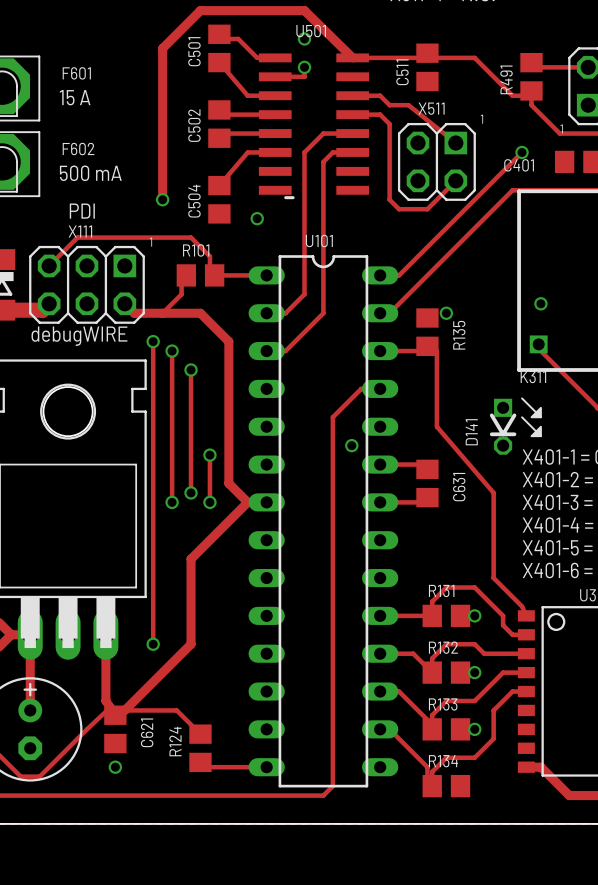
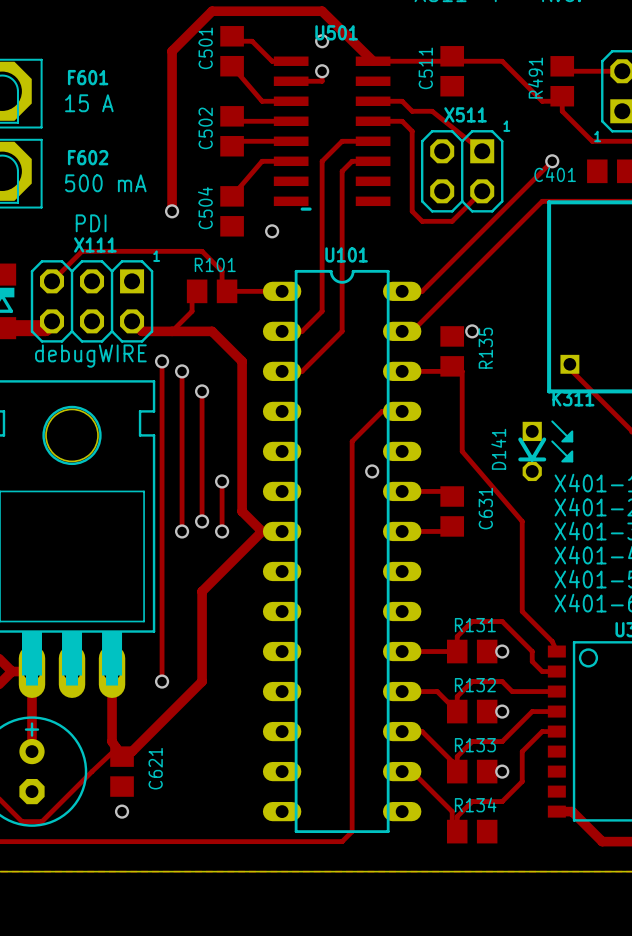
via: (540, 303) -> none
track: (124, 710) (176, 710) (200, 734) -> none
R124: (200, 748) -> none
track: (200, 762) (200, 767) (266, 767) -> none

